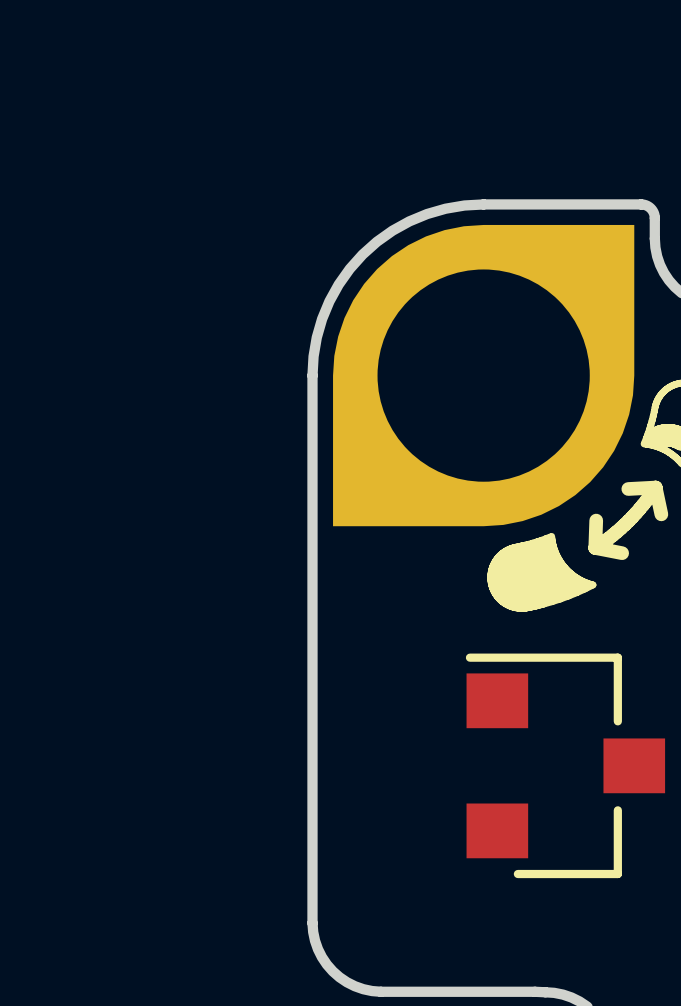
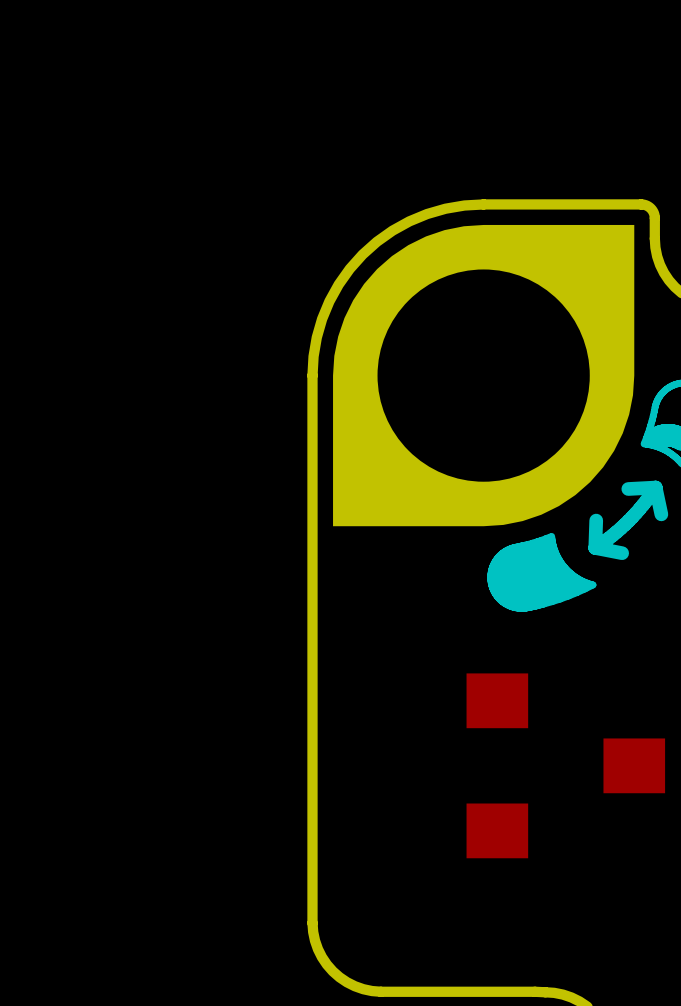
part footprint: [465, 653, 666, 879] -> [466, 673, 666, 859]

